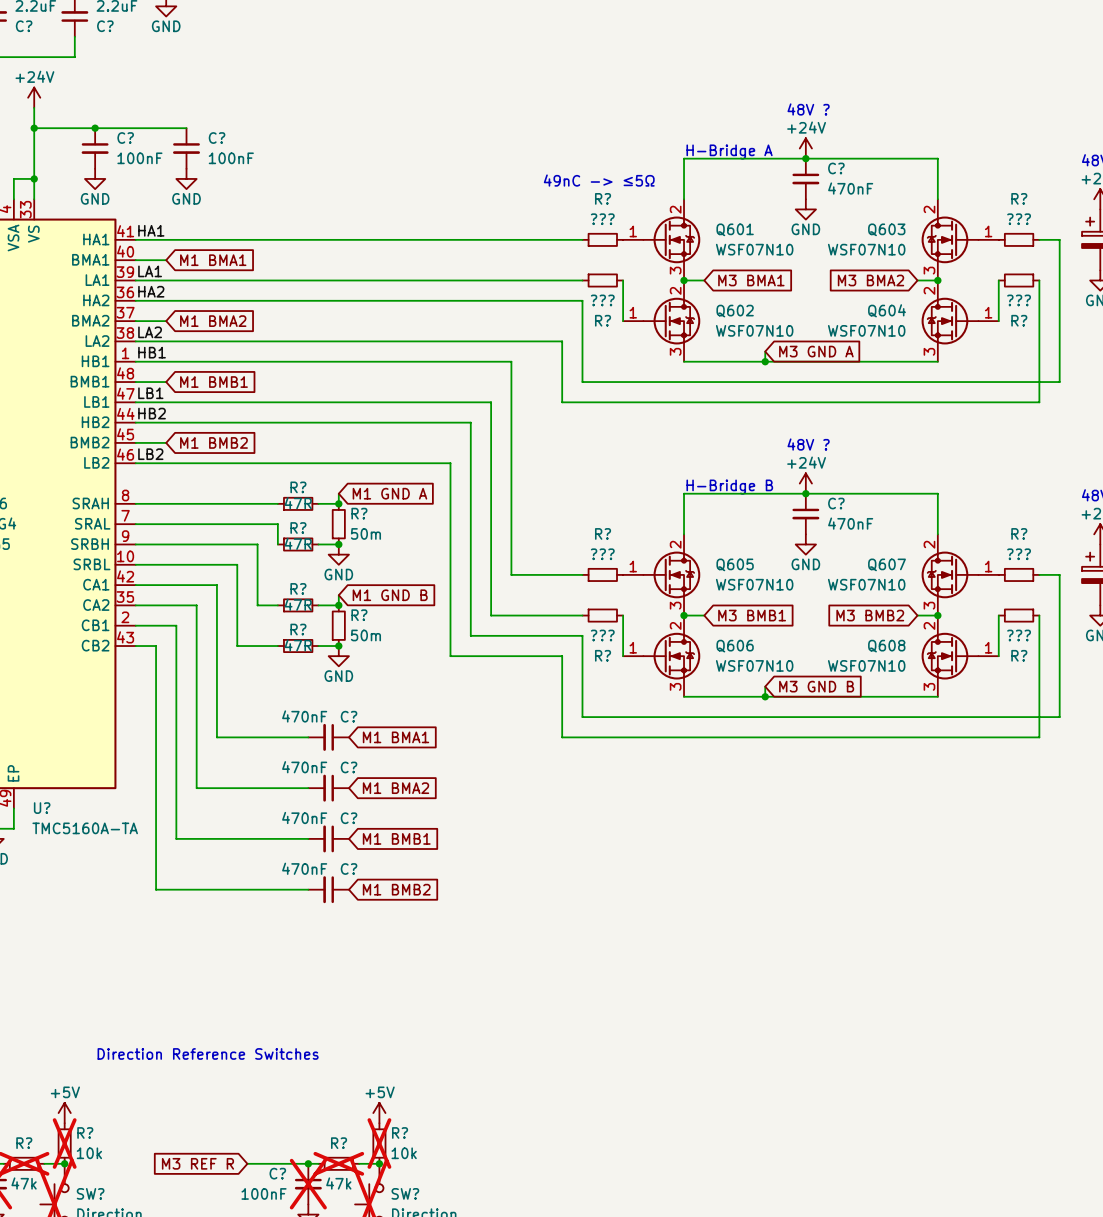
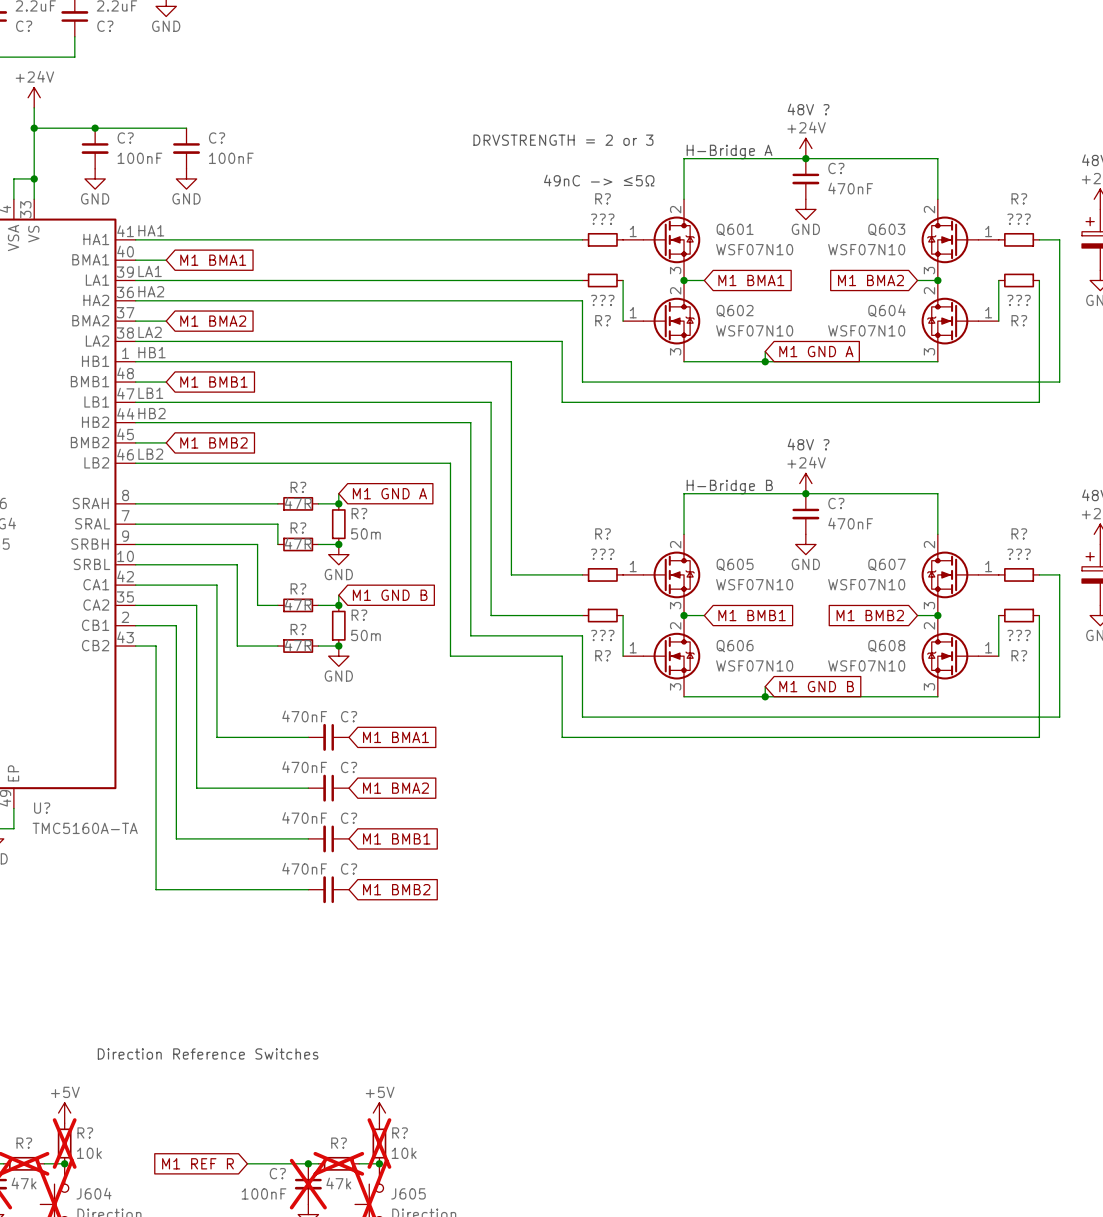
text: none -> DRVSTRENGTH = 2 or 3 (563, 140)
global label: M3 BMA1 (751, 280) -> M1 BMA1 (751, 280)
global label: M3 BMA2 (870, 280) -> M1 BMA2 (870, 280)
global label: M3 GND A (816, 351) -> M1 GND A (816, 351)
global label: M3 BMB1 (752, 615) -> M1 BMB1 (752, 615)
global label: M3 BMB2 (870, 615) -> M1 BMB2 (870, 615)
global label: M3 GND B (816, 686) -> M1 GND B (816, 686)
global label: M3 REF R (197, 1163) -> M1 REF R (197, 1163)
SW? name: SW? (90, 1193) -> J604 (93, 1193)
SW? name: SW? (405, 1193) -> J605 (408, 1193)

